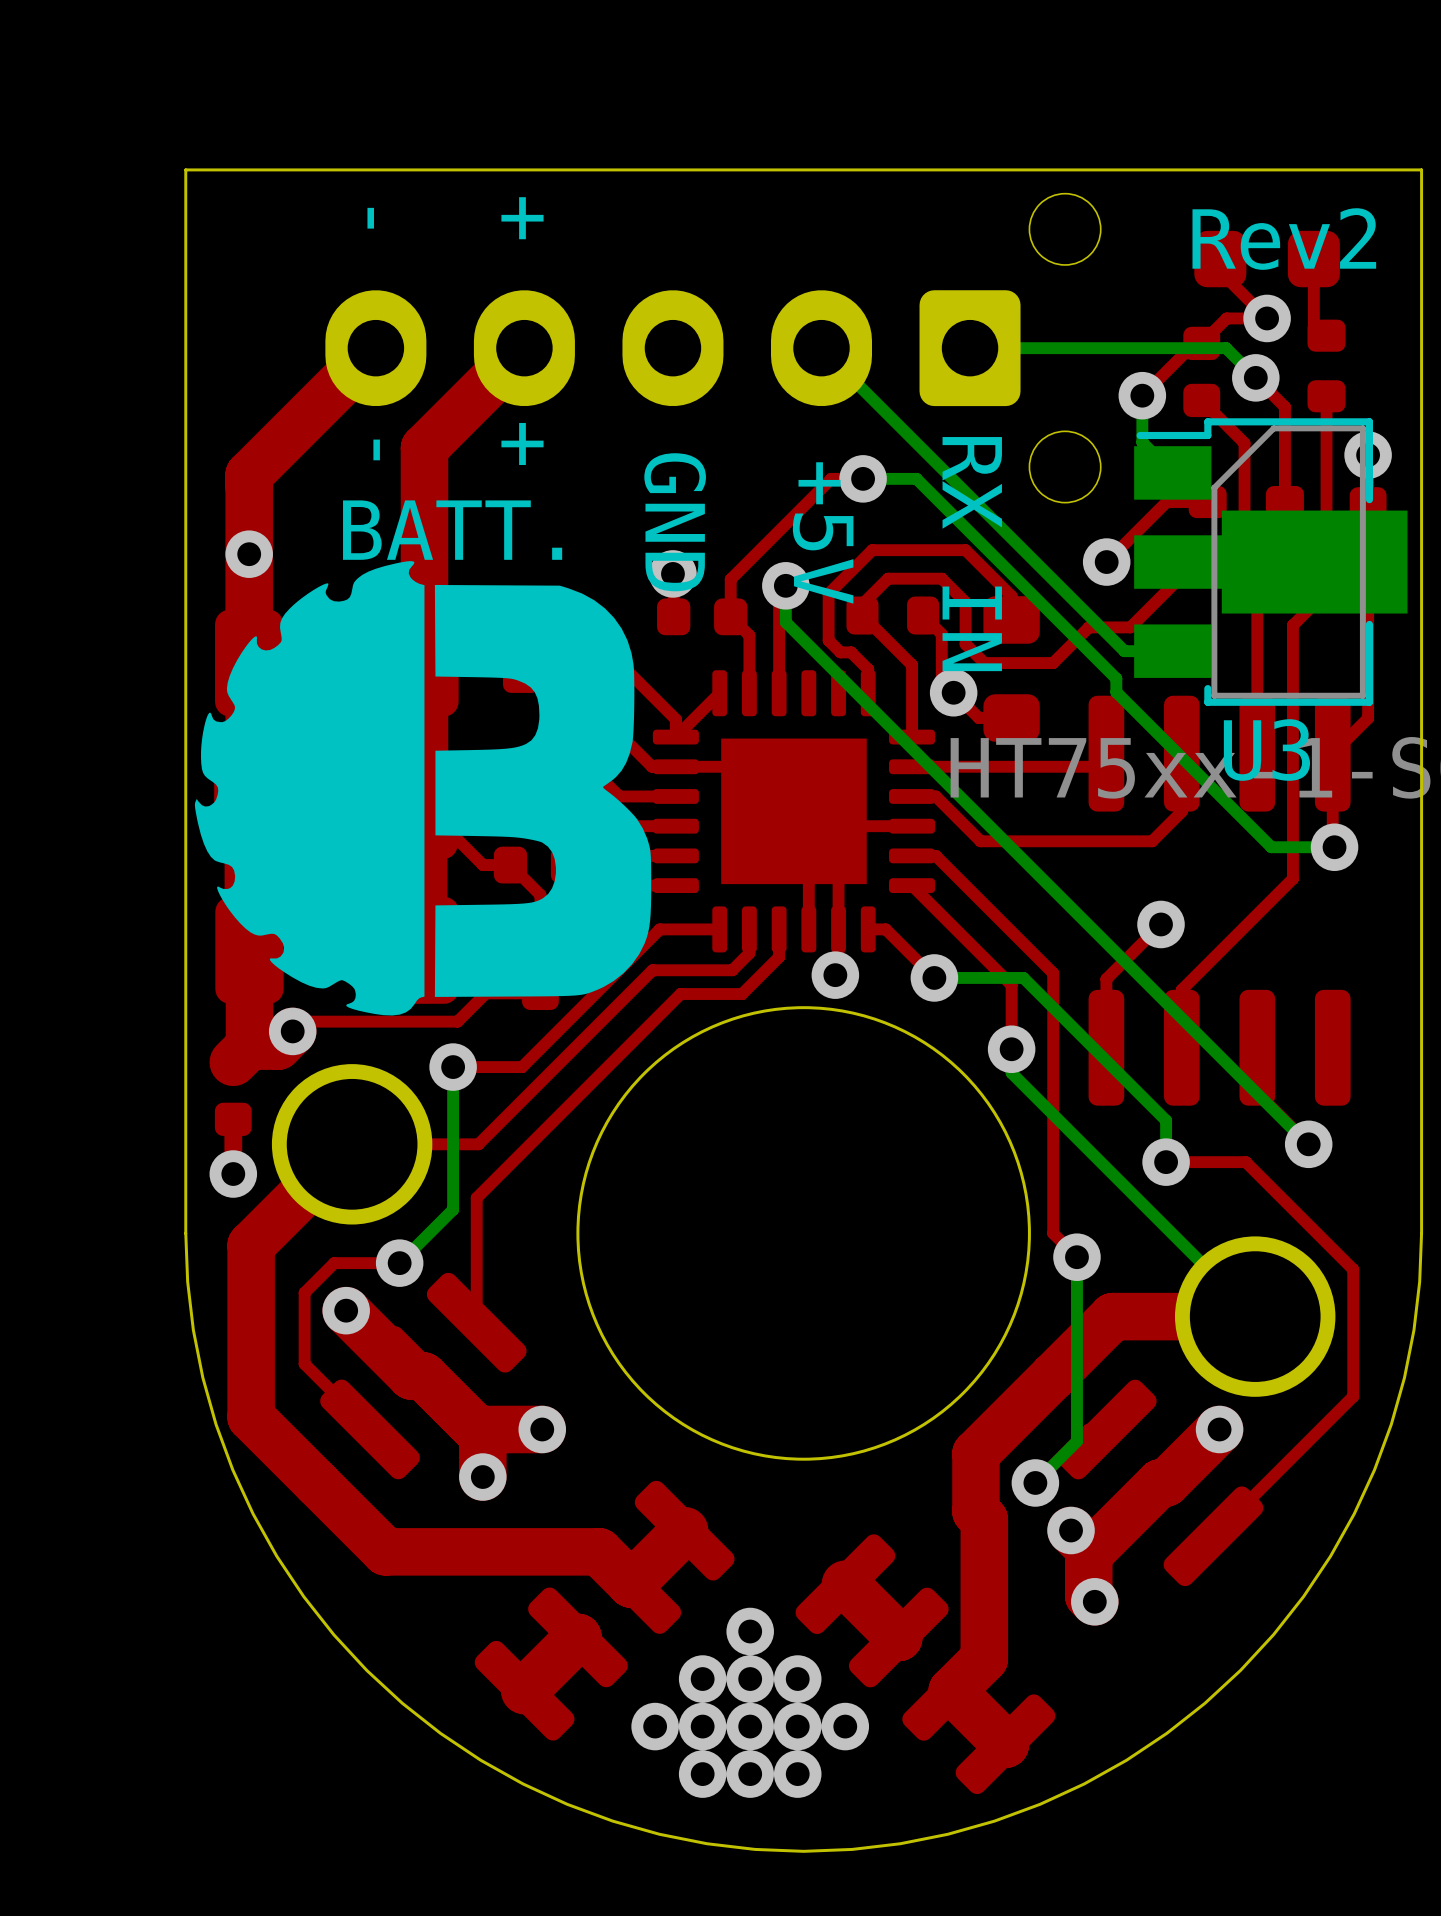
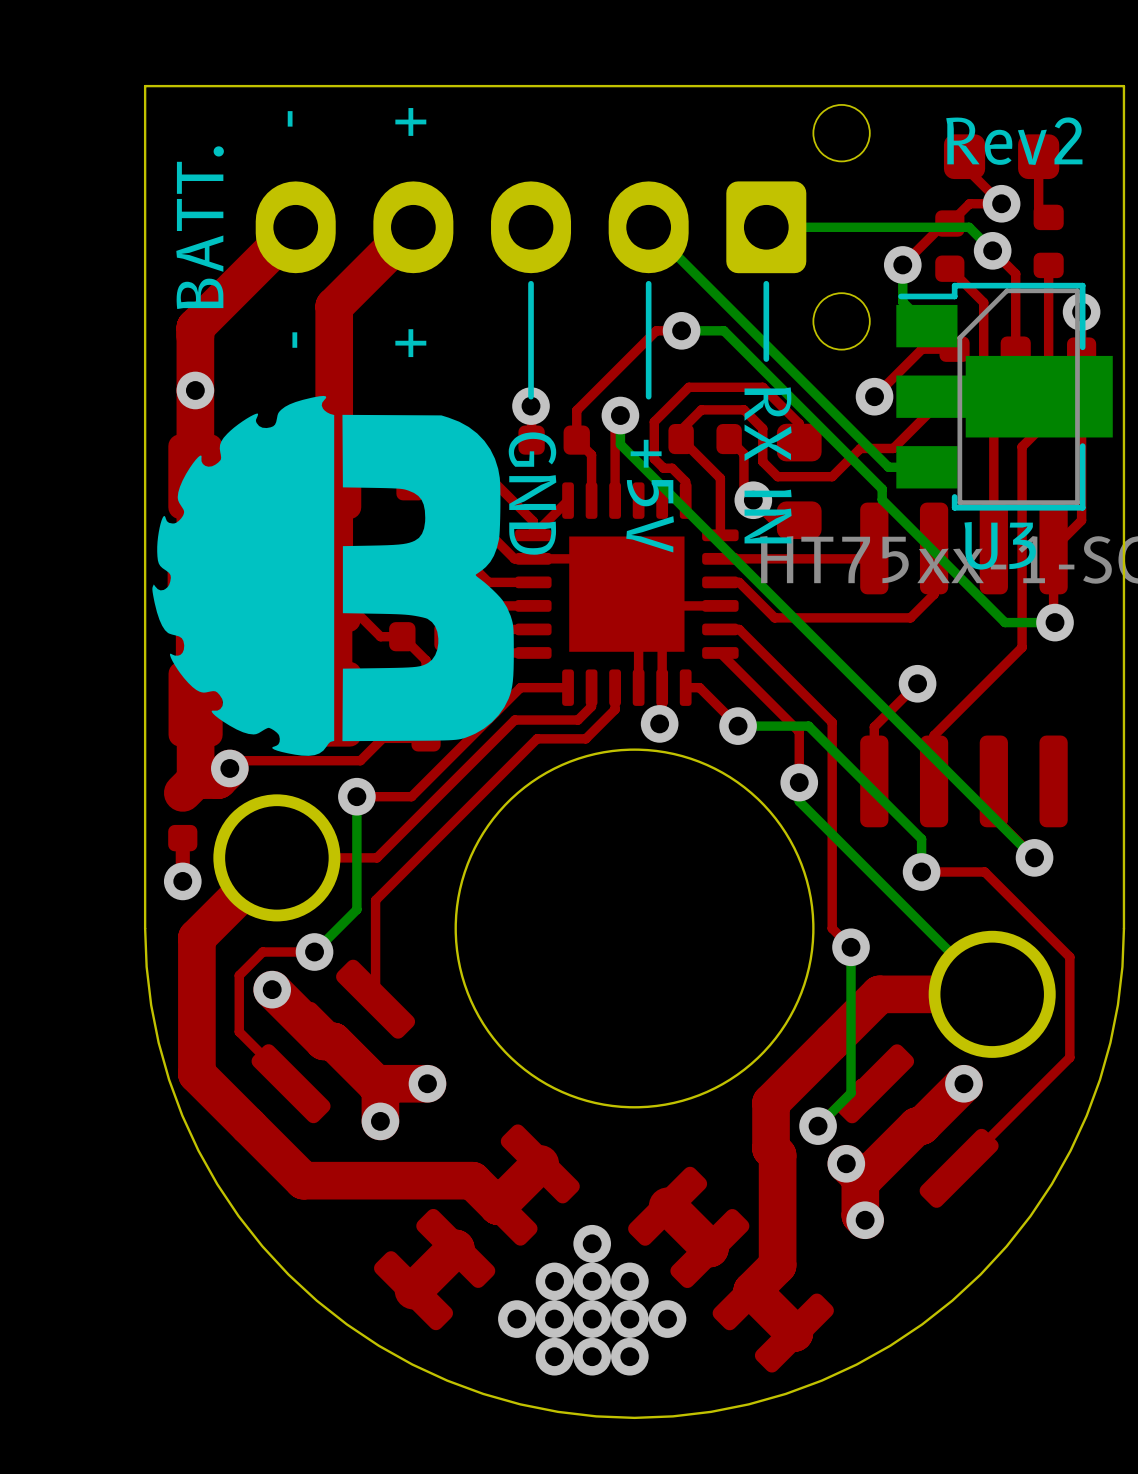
line: none -> (531, 283) (531, 396)
line: none -> (648, 283) (648, 396)
line: none -> (766, 283) (766, 359)
text position: + (522, 443) -> + (410, 343)
text position: - (376, 449) -> - (294, 340)
text position: GND (675, 522) -> GND (532, 493)
text rotation: 0° (452, 530) -> 90° counterclockwise (200, 227)
text position: +5V (823, 532) -> +5V (650, 496)
text position: RX IN (972, 554) -> RX IN (768, 465)

